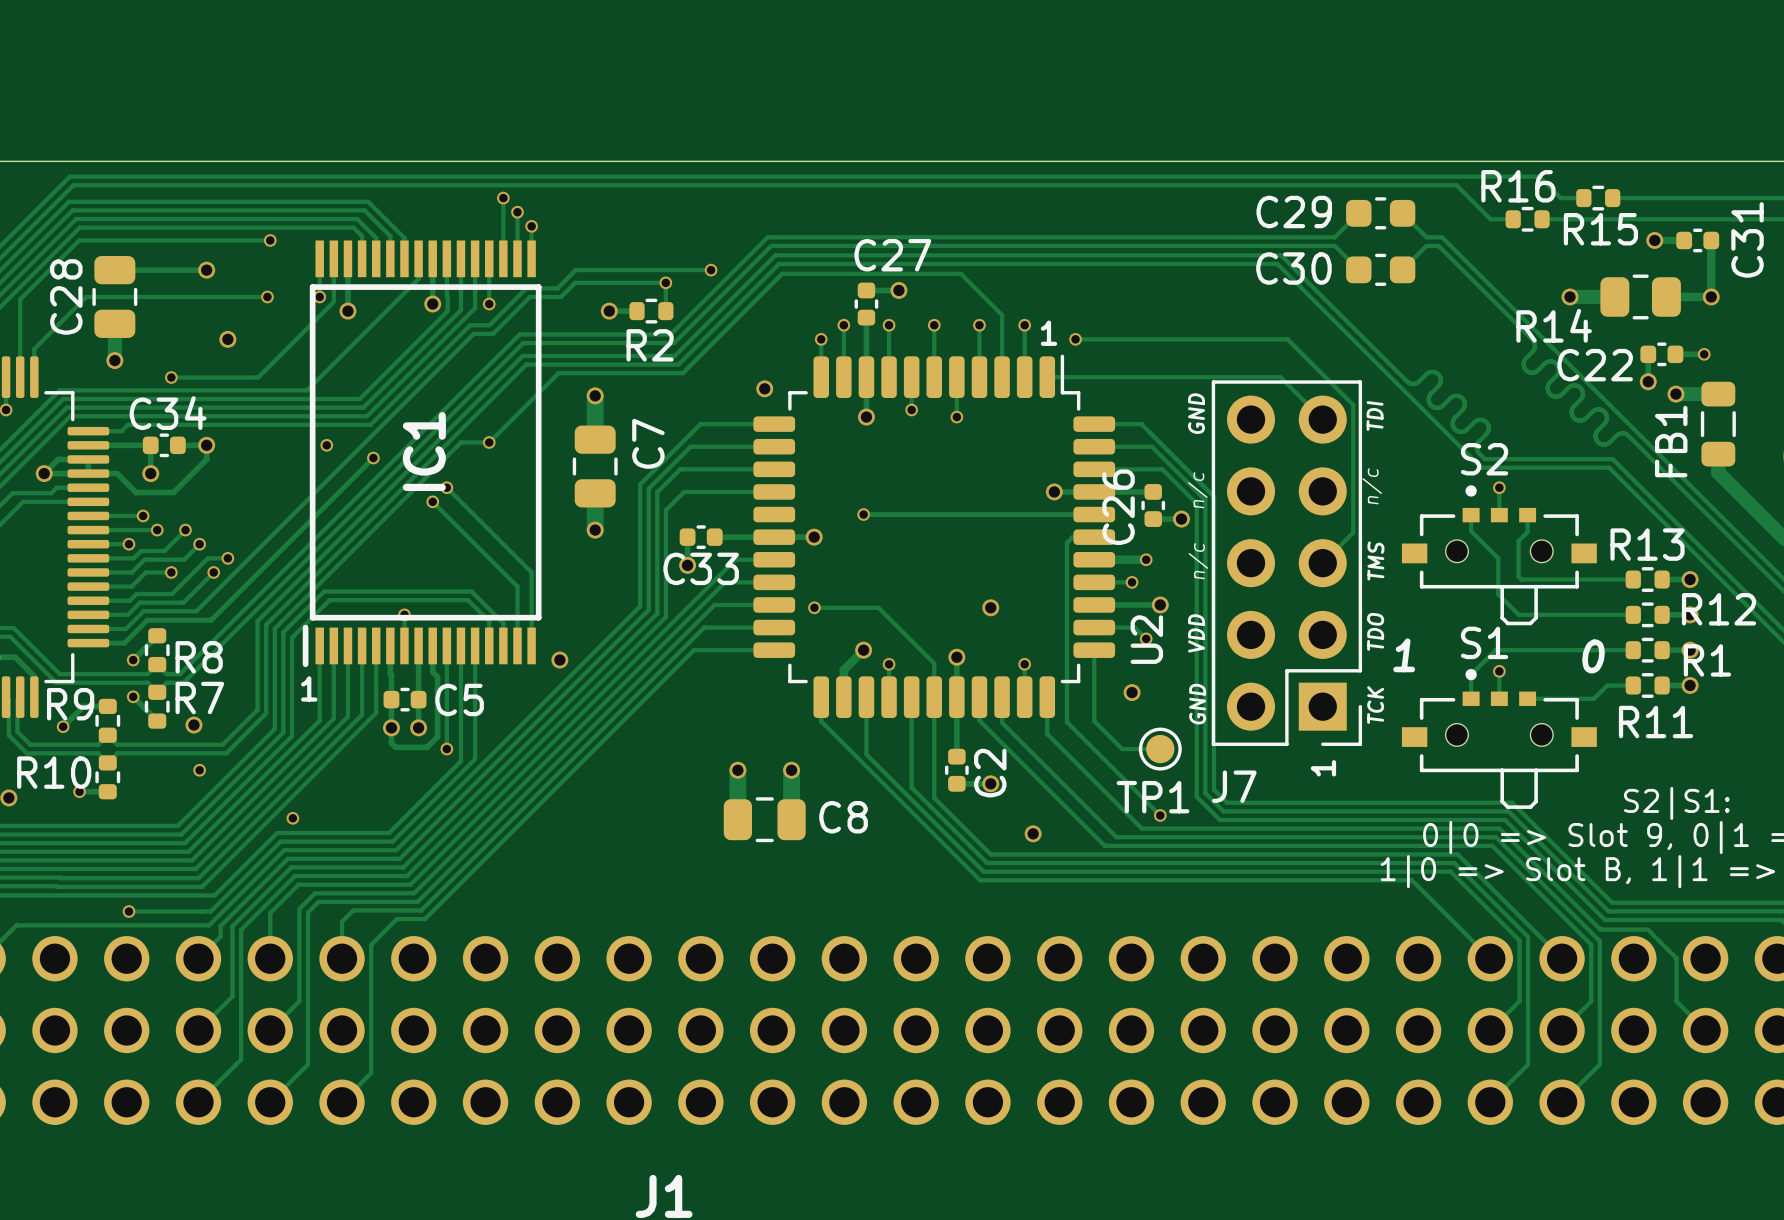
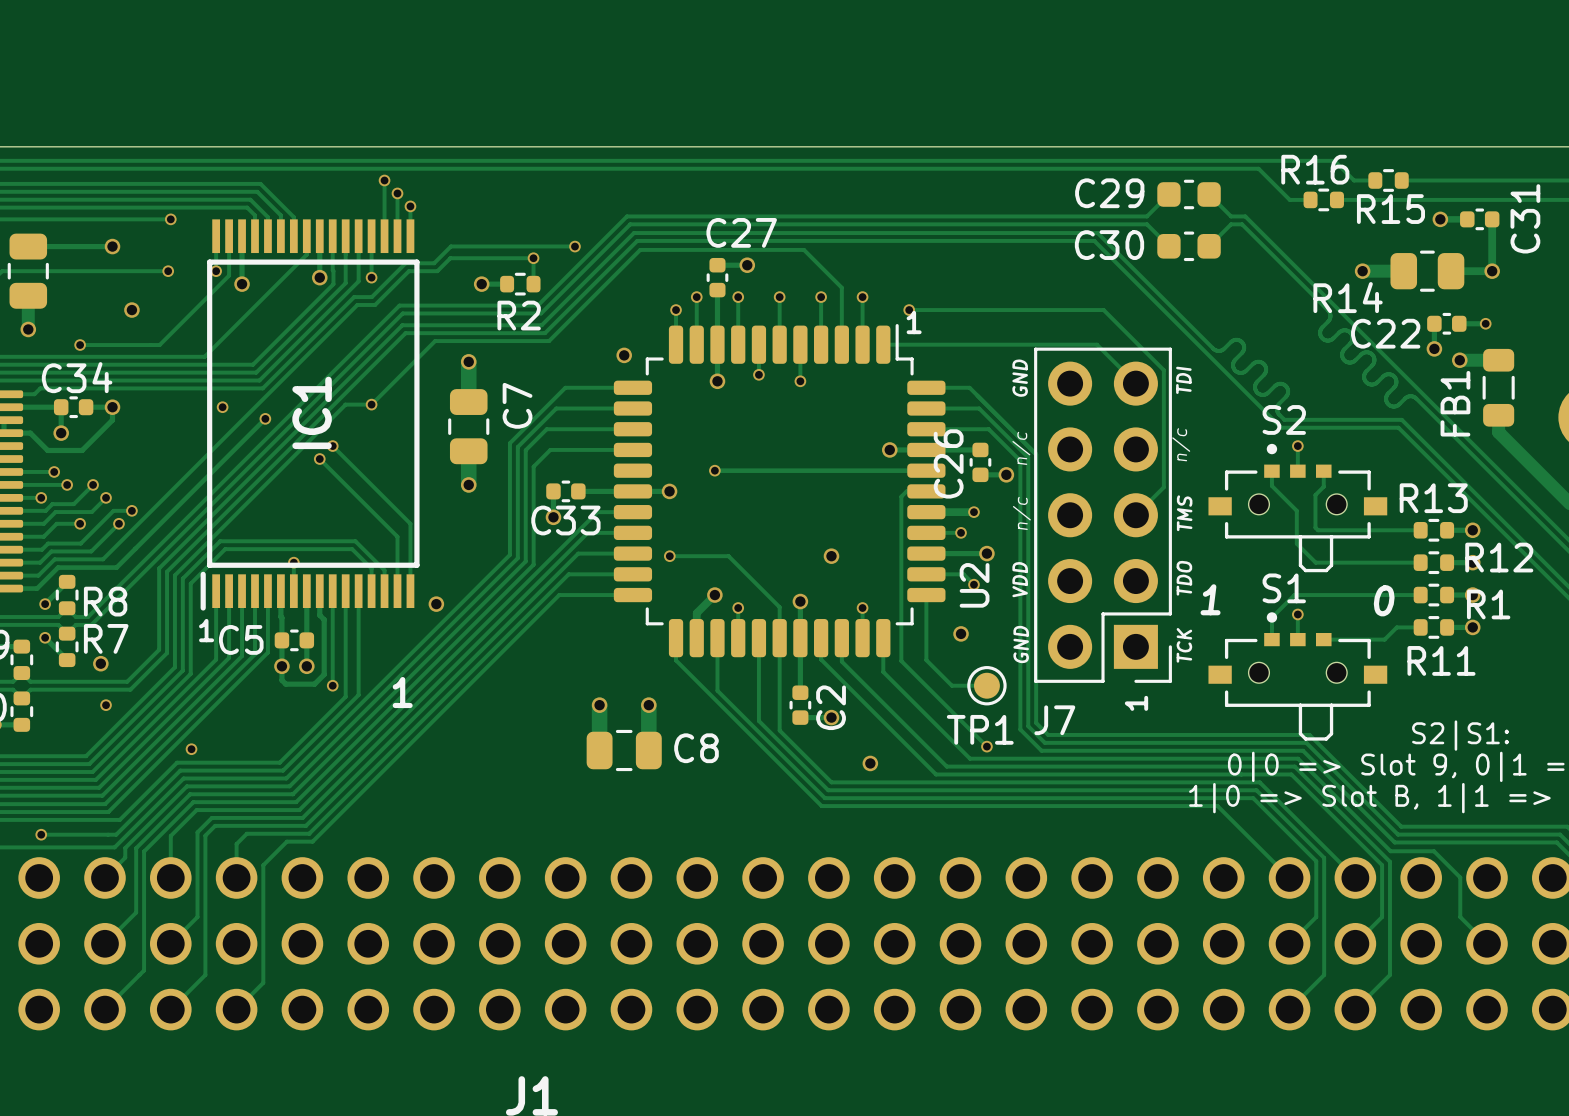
text position: 1 (1048, 333) -> 1 (914, 322)
C5 name position: C5 (459, 699) -> C5 (241, 639)
text: none -> 1 (402, 692)

